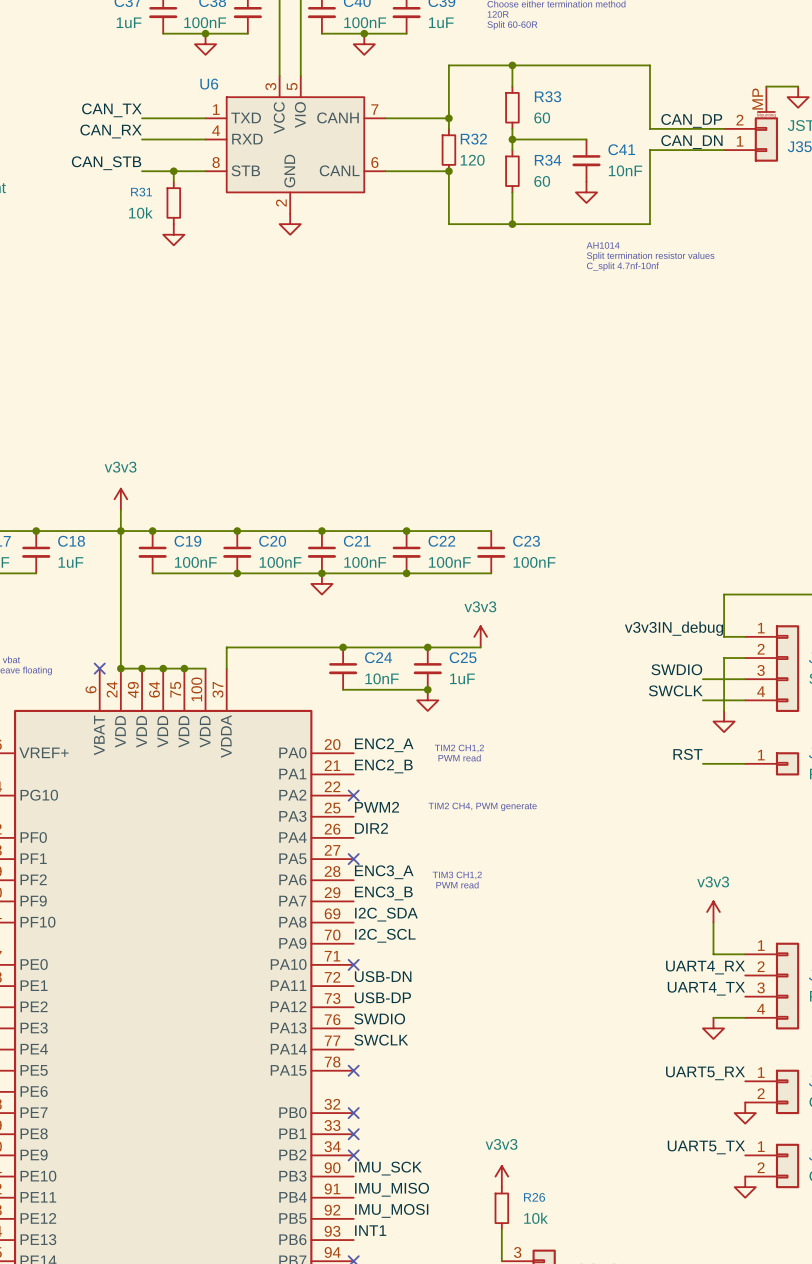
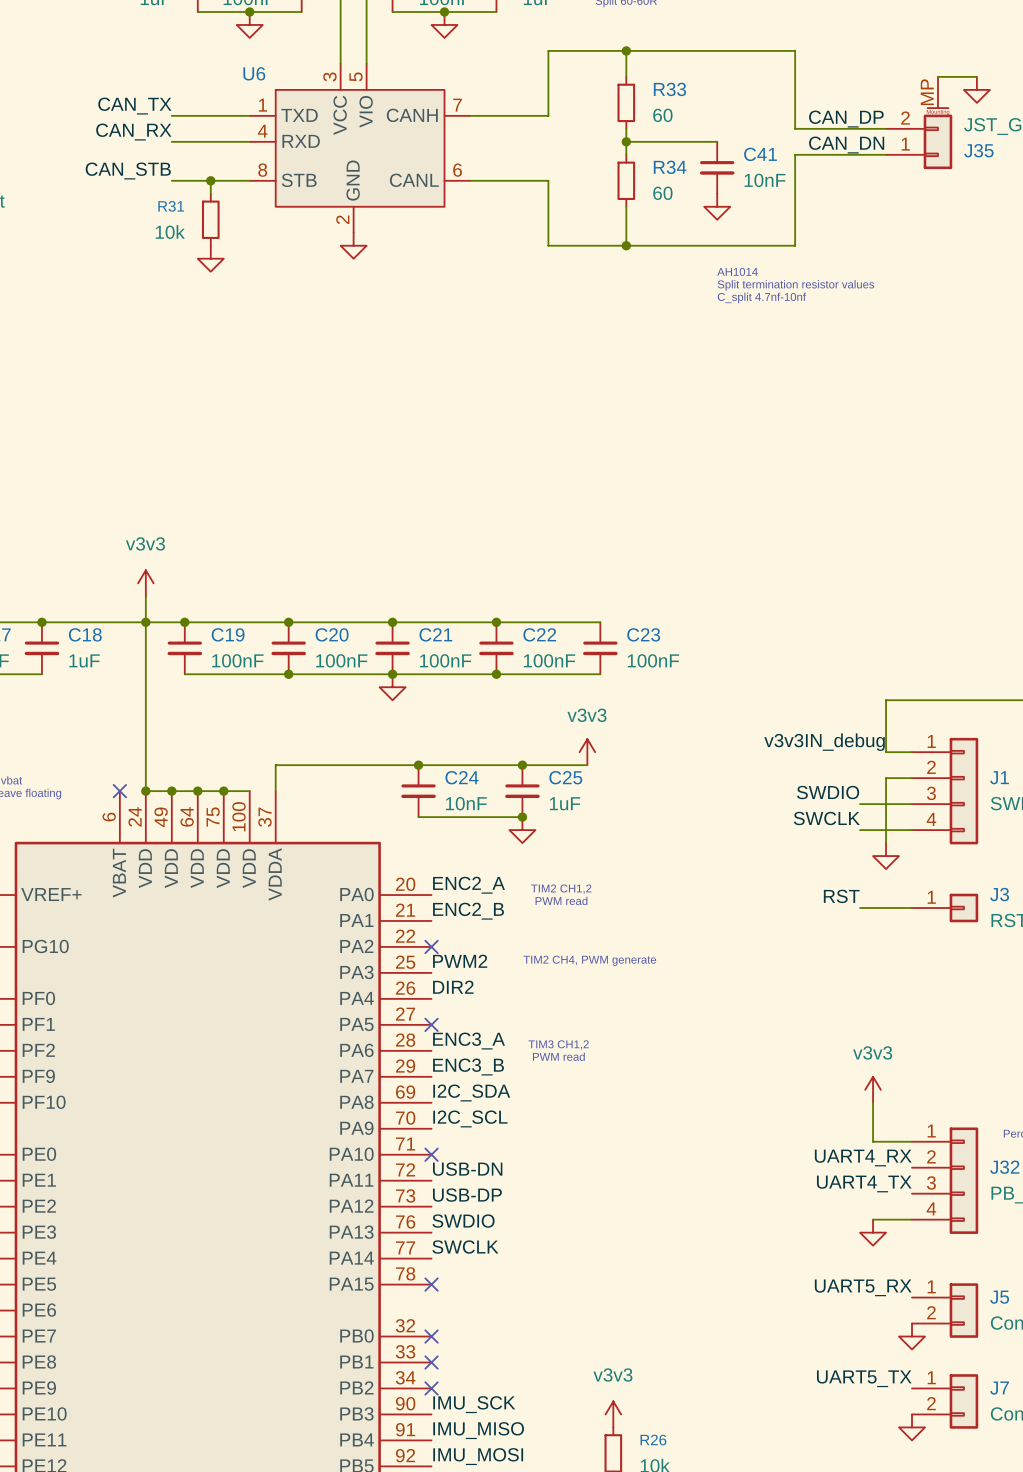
wire: (448, 118) (448, 128) -> none
junction: (448, 118) -> none
R32: 120 (448, 150) -> none
junction: (448, 171) -> none

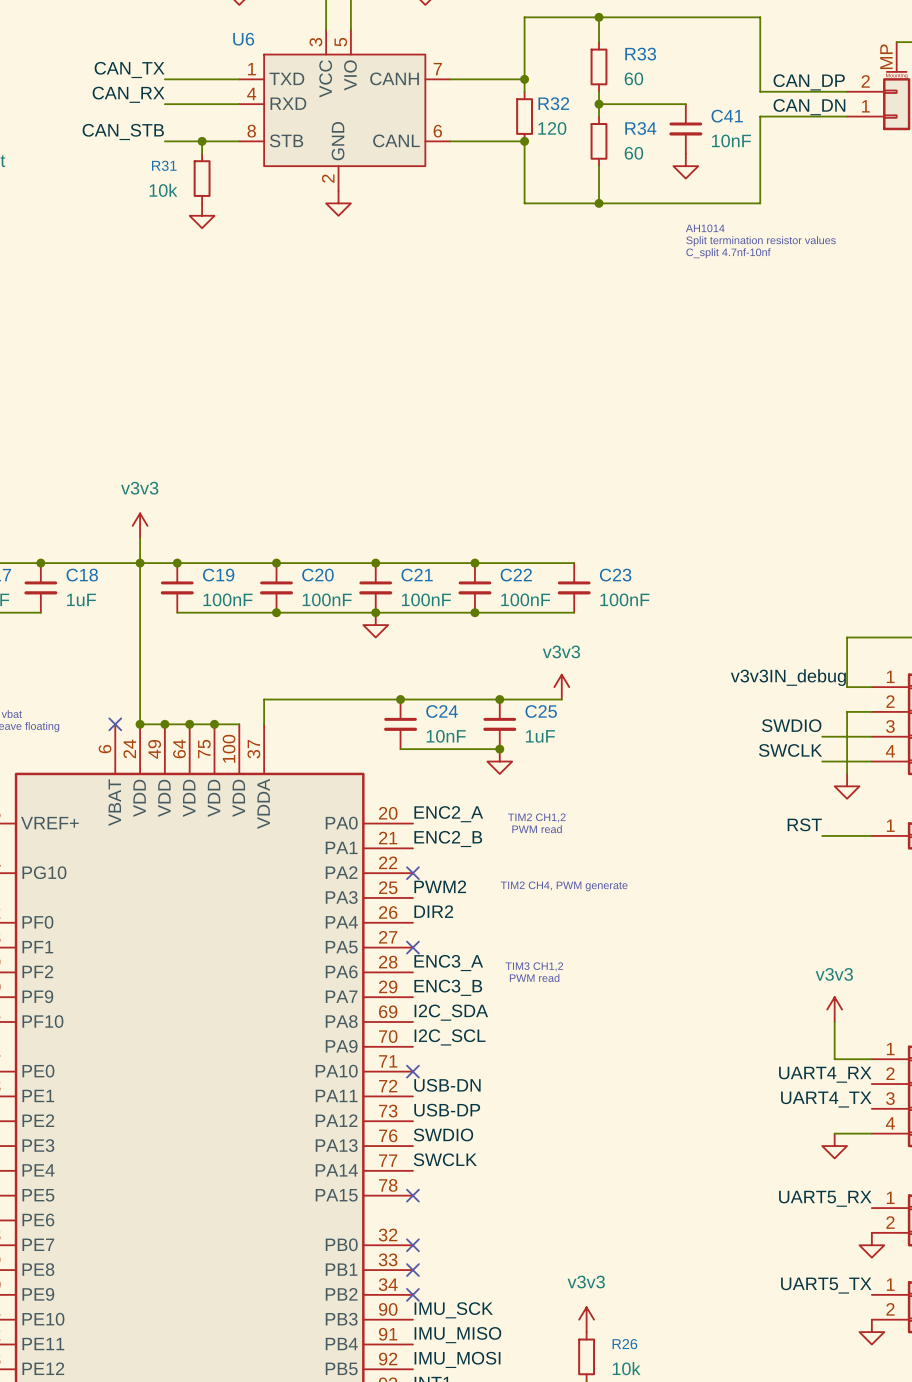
wire: none -> (524, 79) (524, 91)
junction: none -> (524, 79)
R32: none -> 120 (524, 116)
junction: none -> (524, 141)

